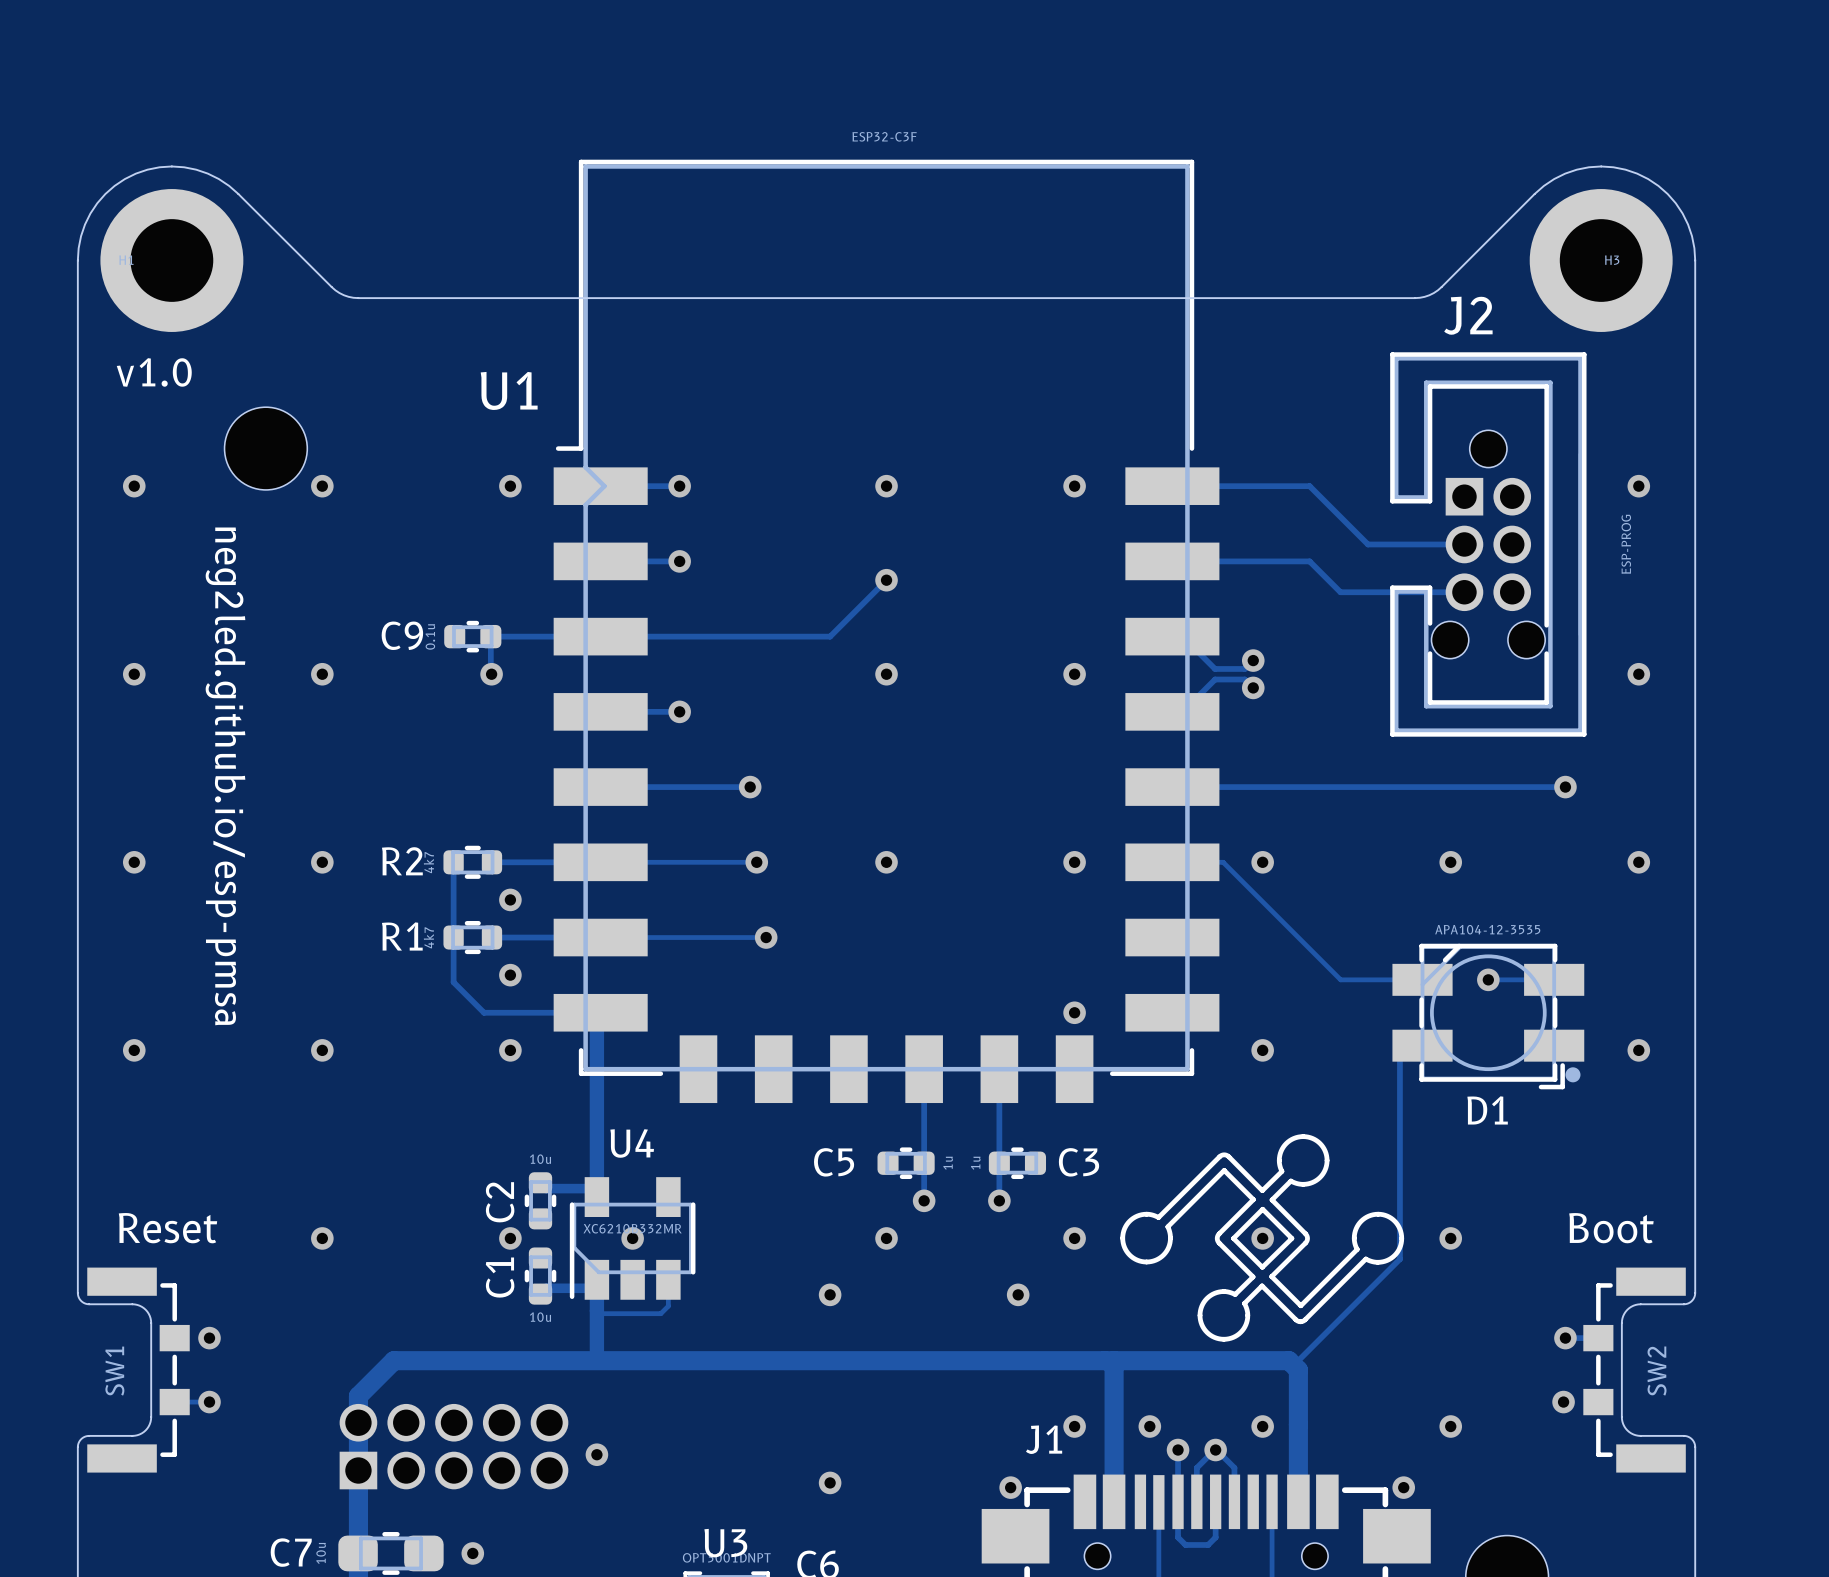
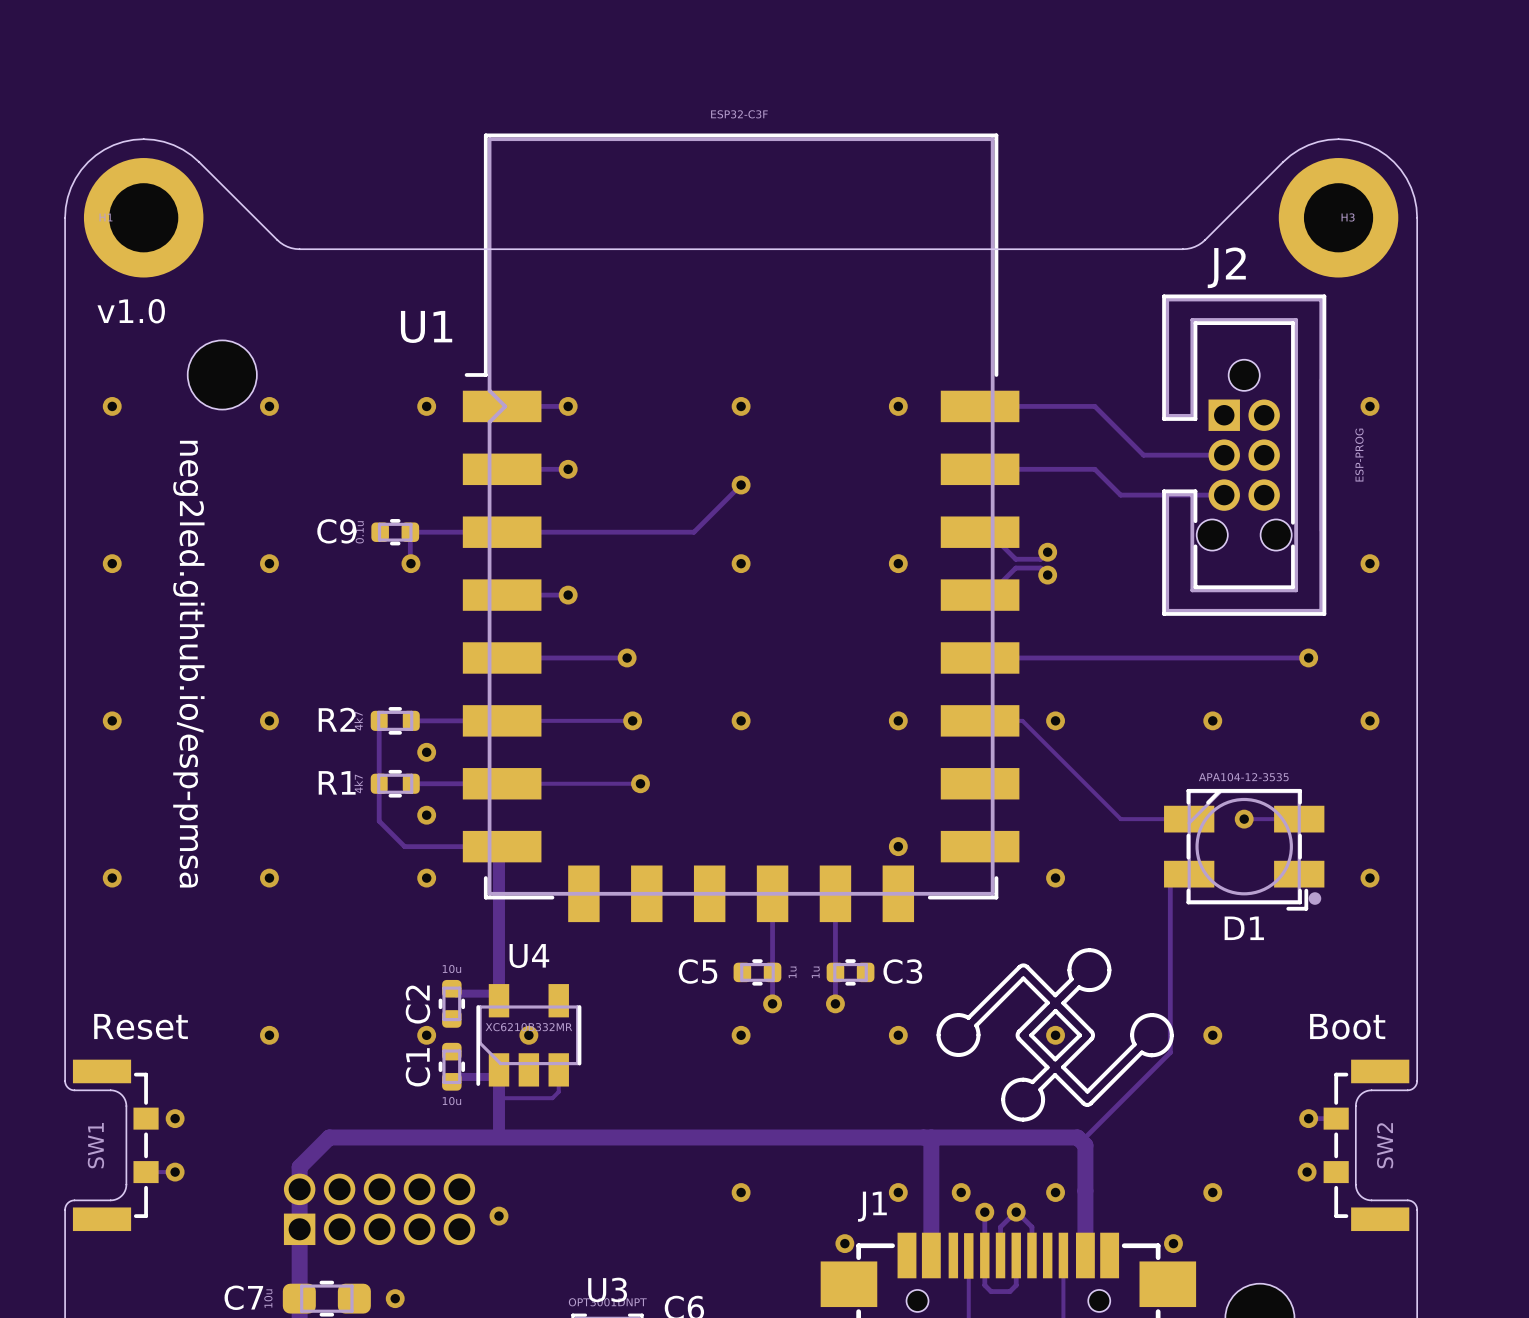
via: (830, 1294) -> none
via: (1018, 1294) -> none
via: none -> (741, 1192)
via: (830, 1482) -> none

